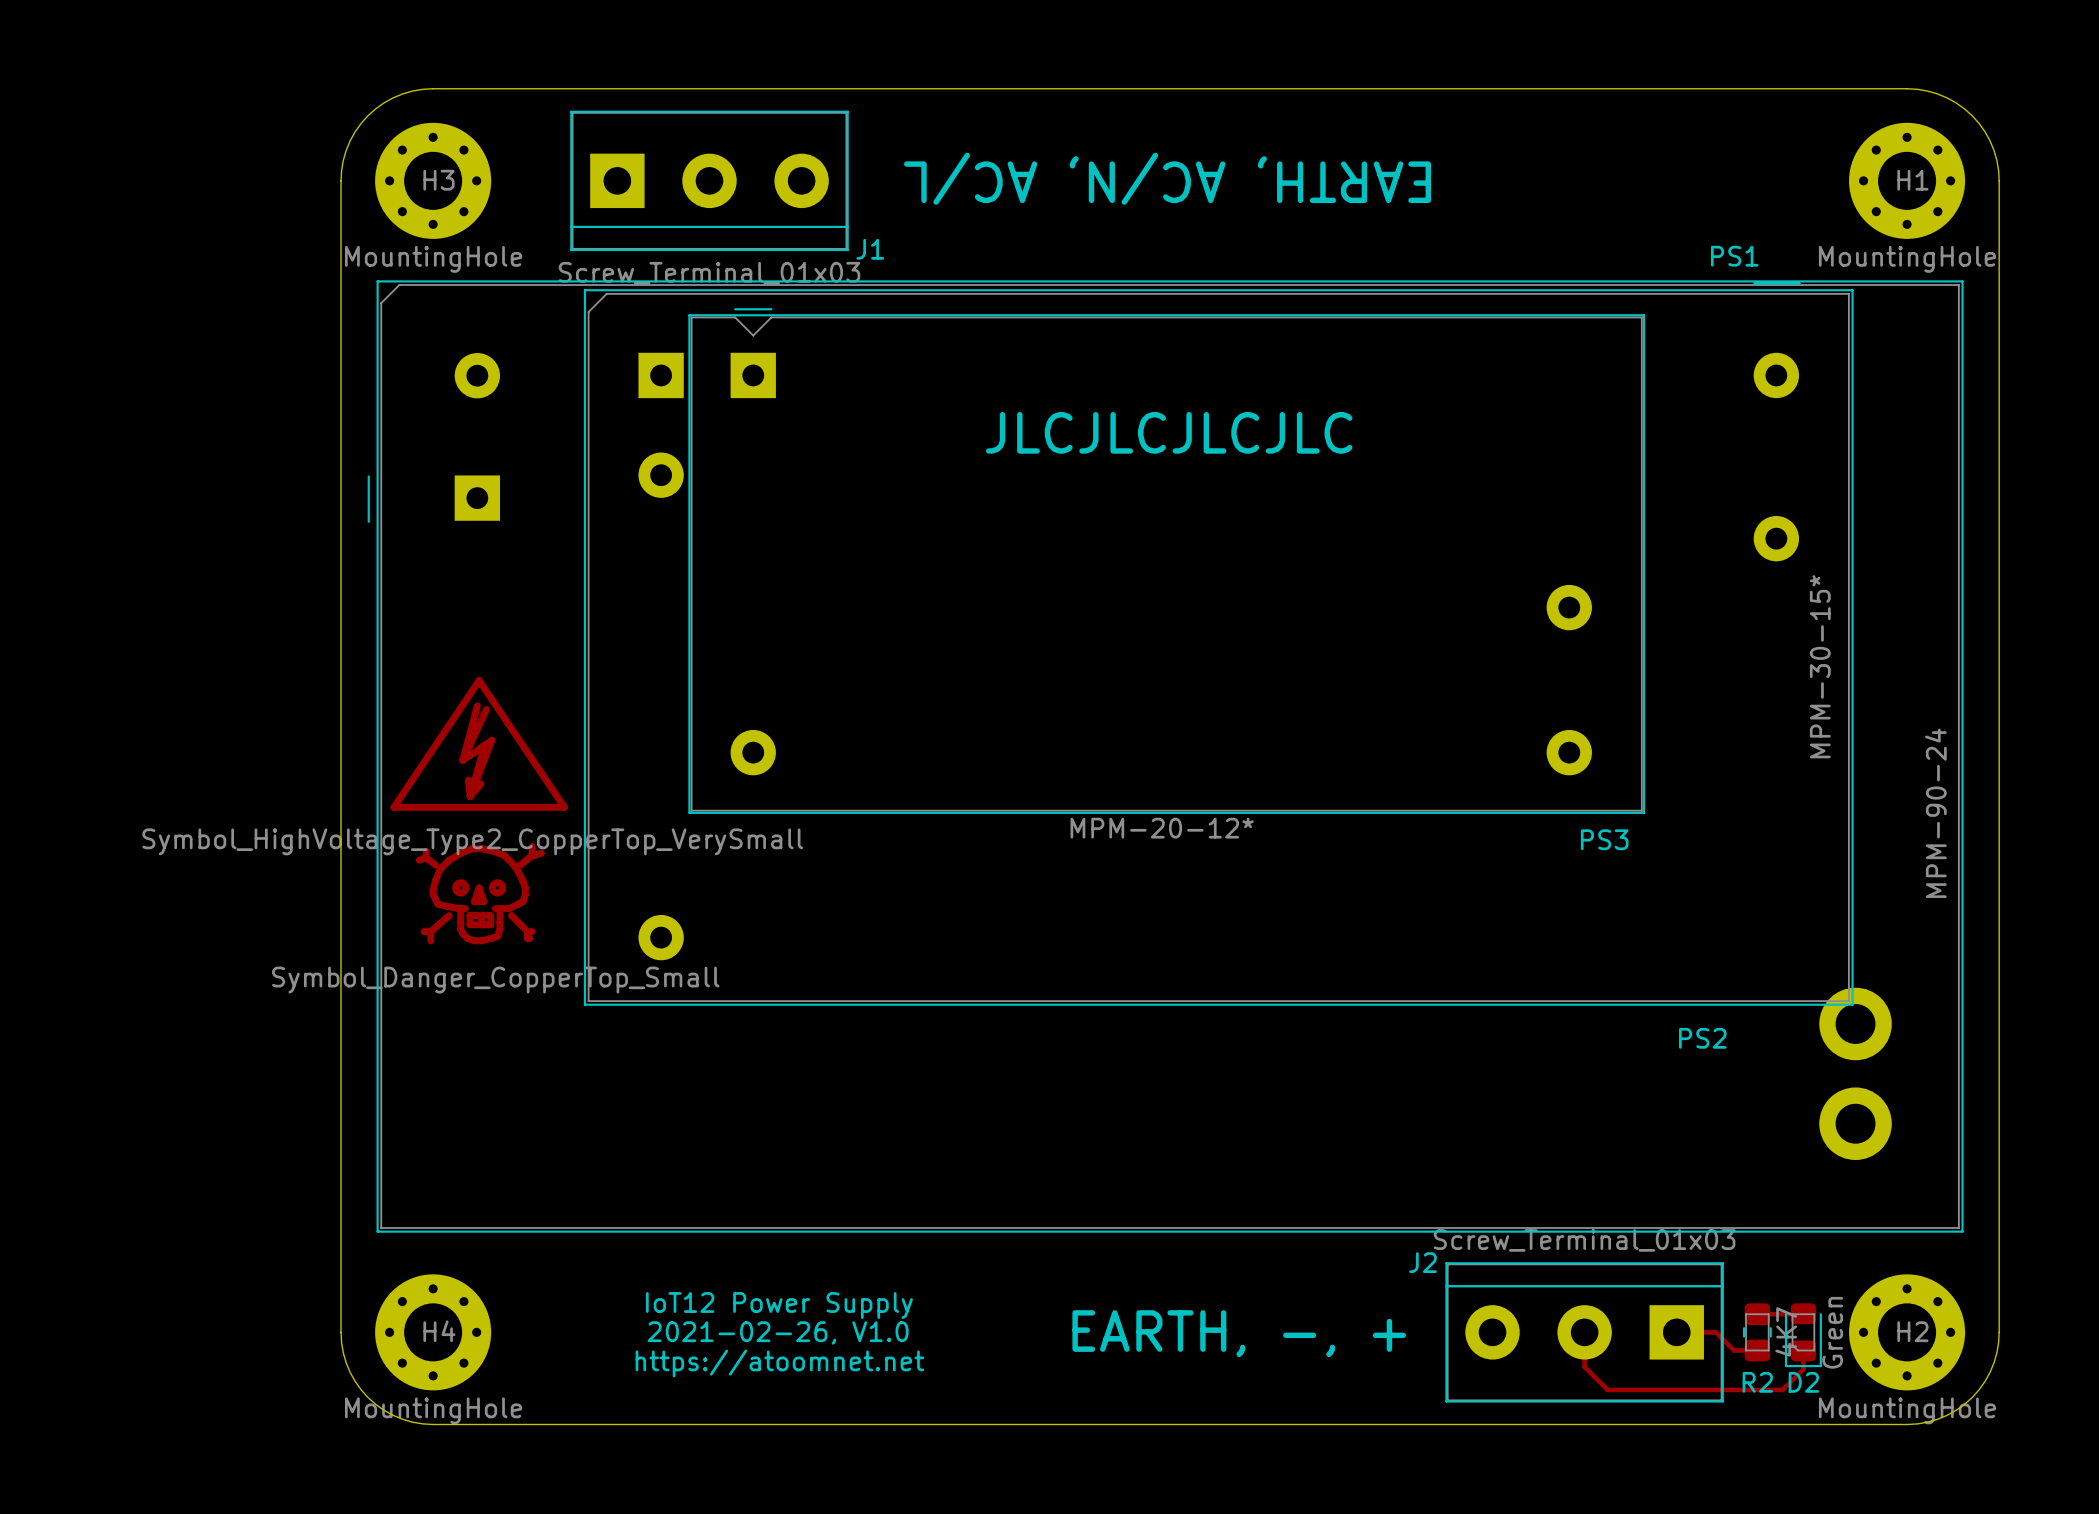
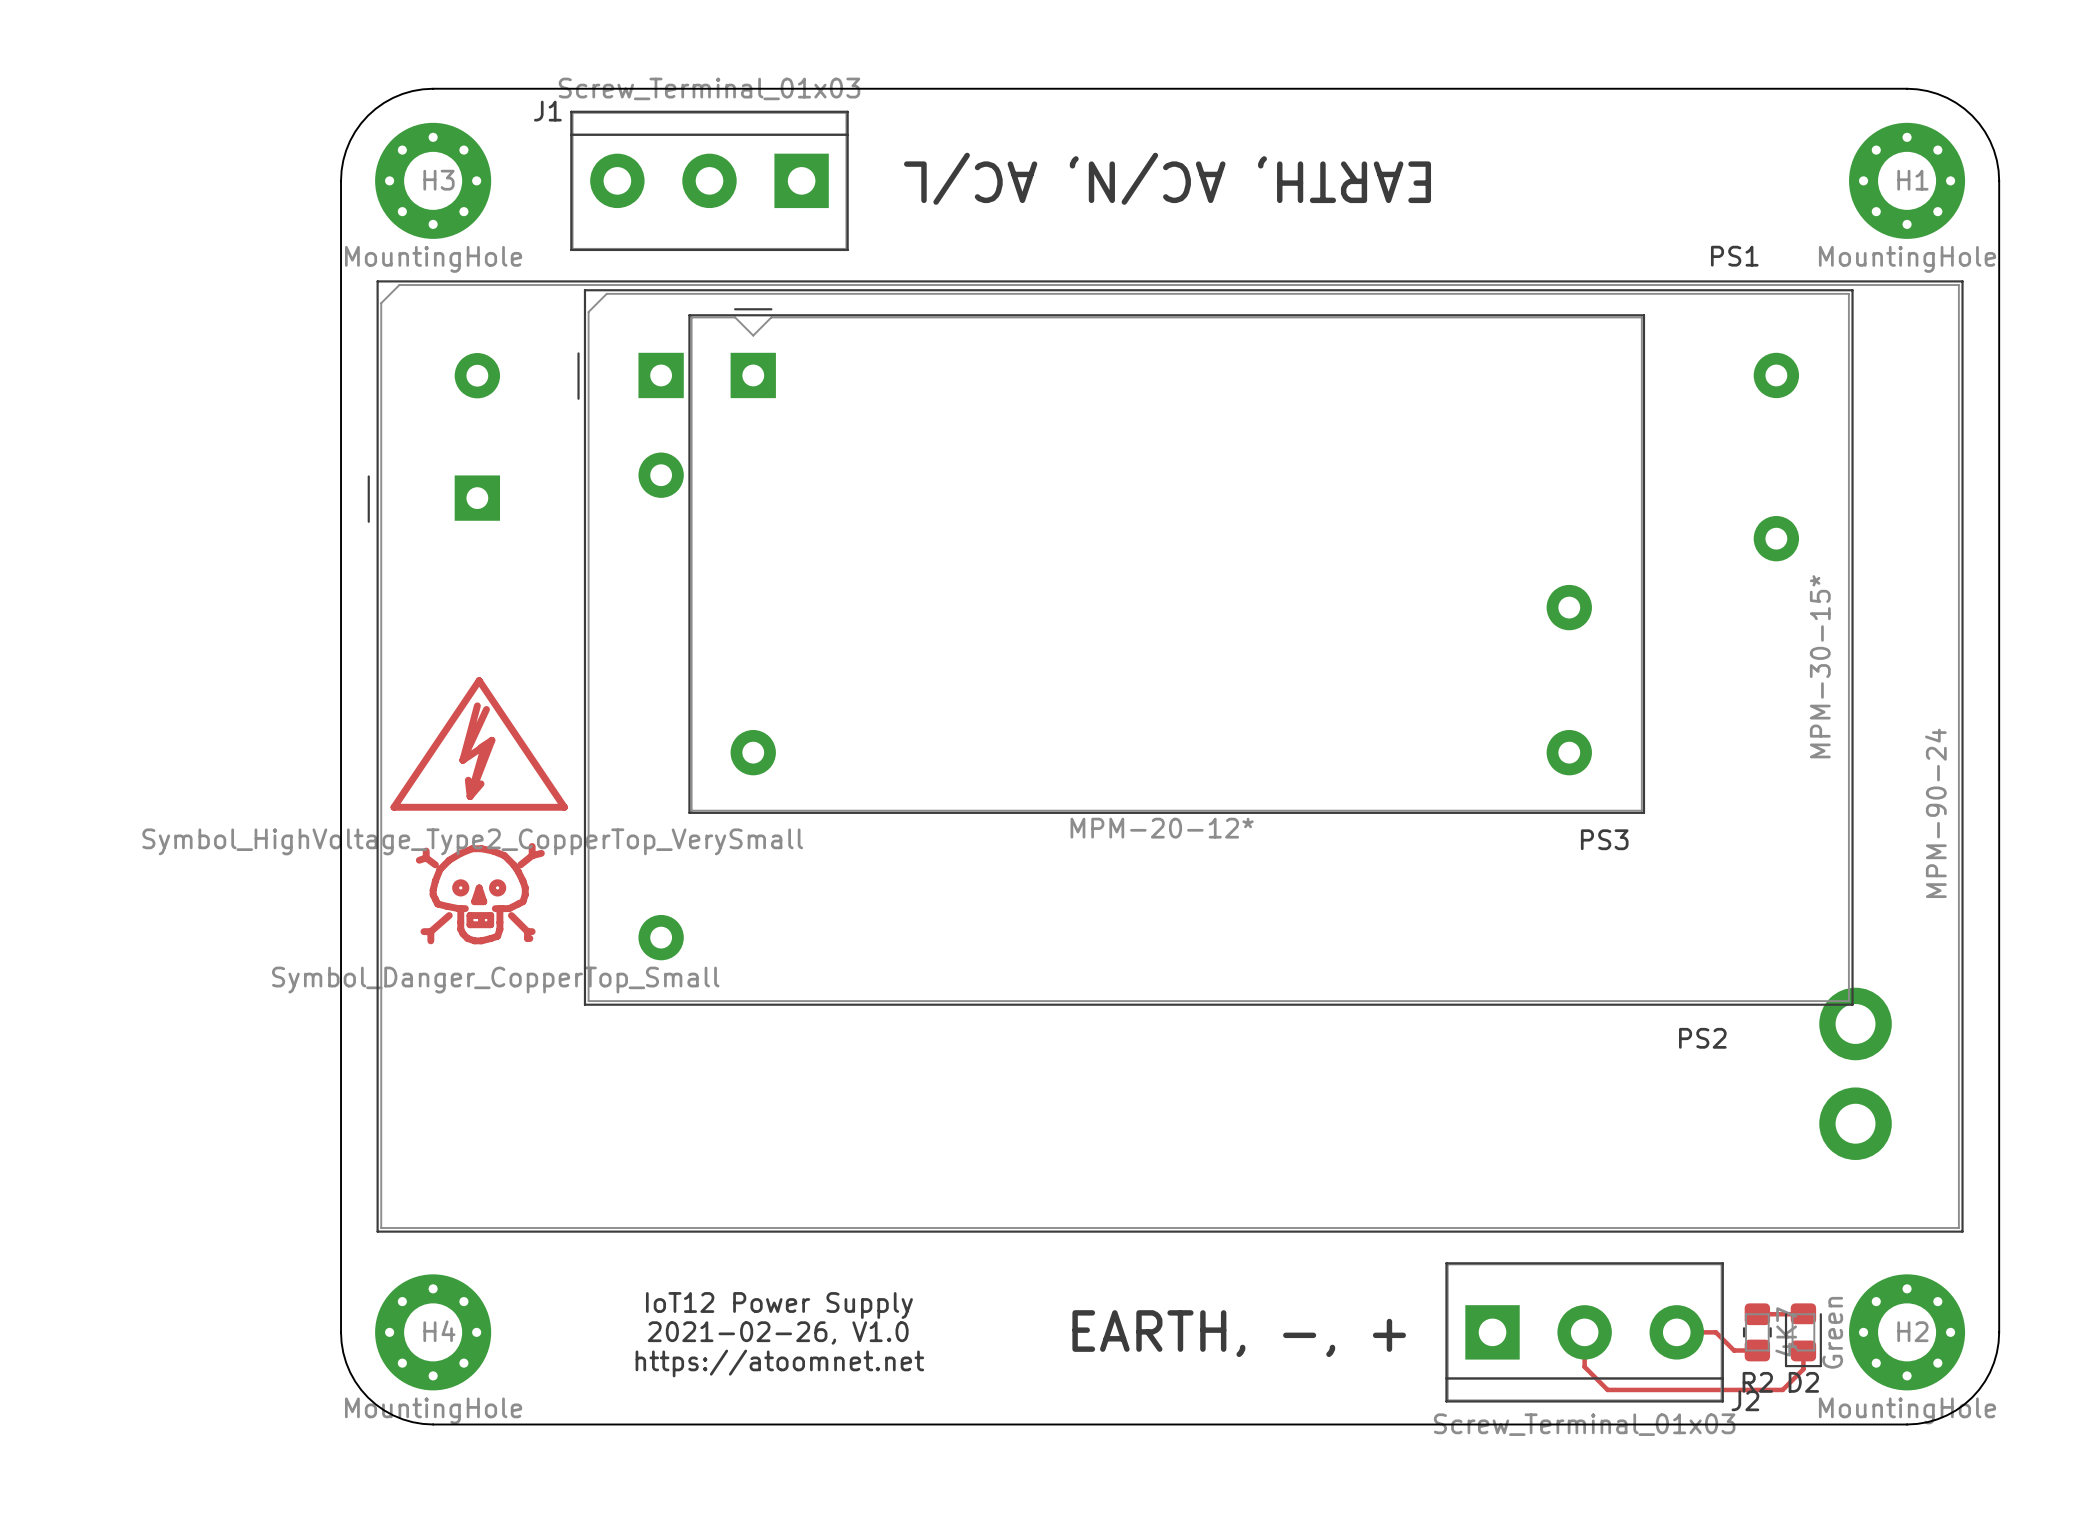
J1 rotation: 0° (709, 180) -> 180° (709, 180)
PS2 footprint: [583, 282, 1854, 1006] -> [577, 289, 1854, 1006]
text: JLCJLCJLCJLC (1169, 432) -> none
J2 rotation: 0° (1584, 1332) -> 180° (1584, 1332)

